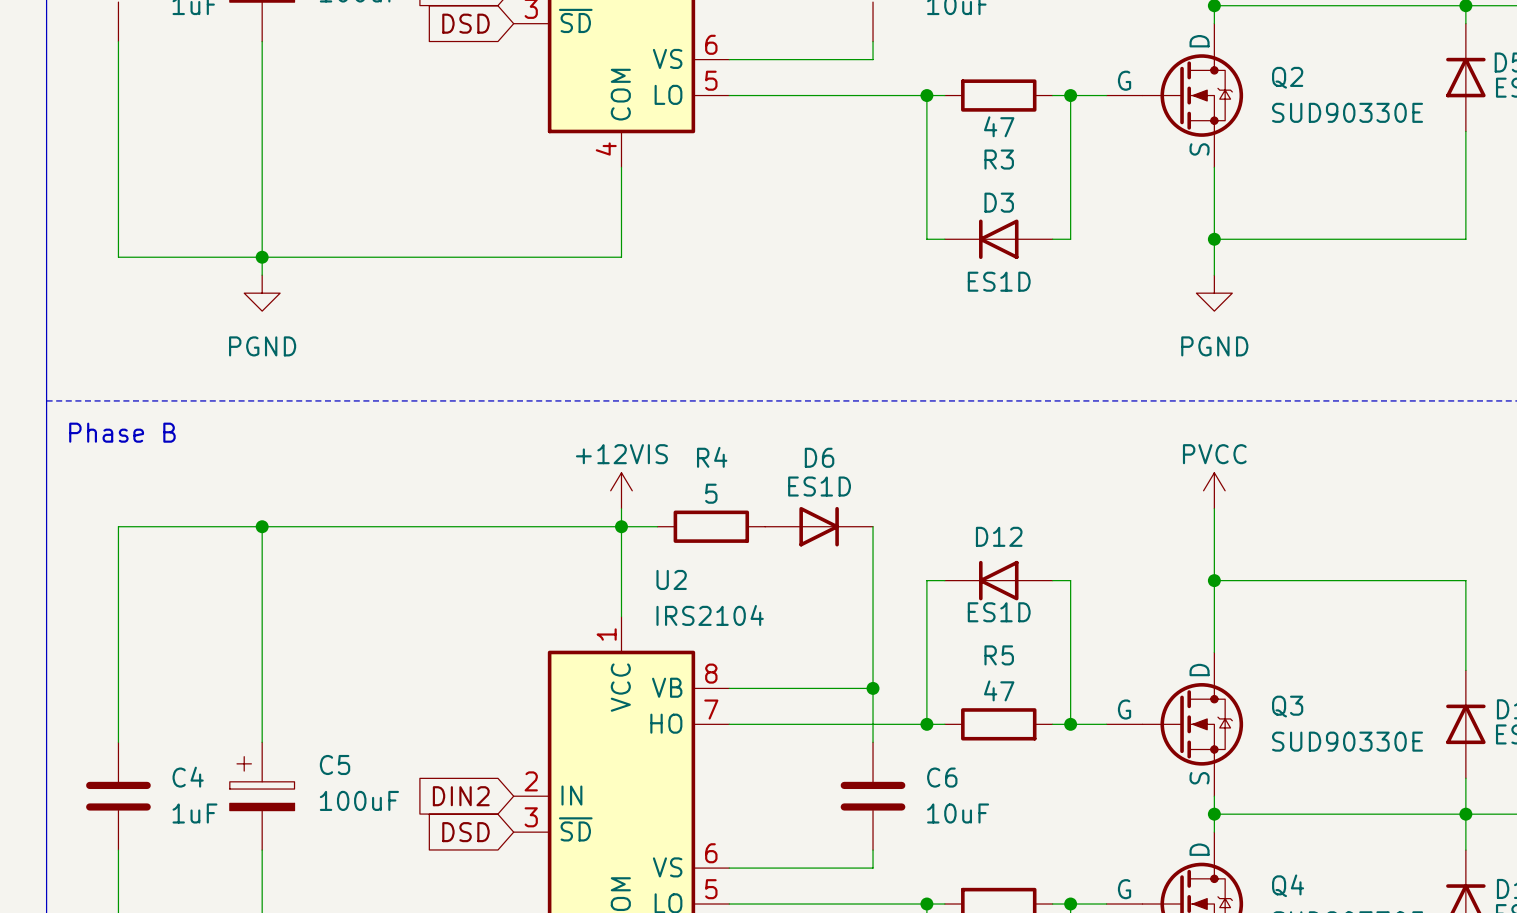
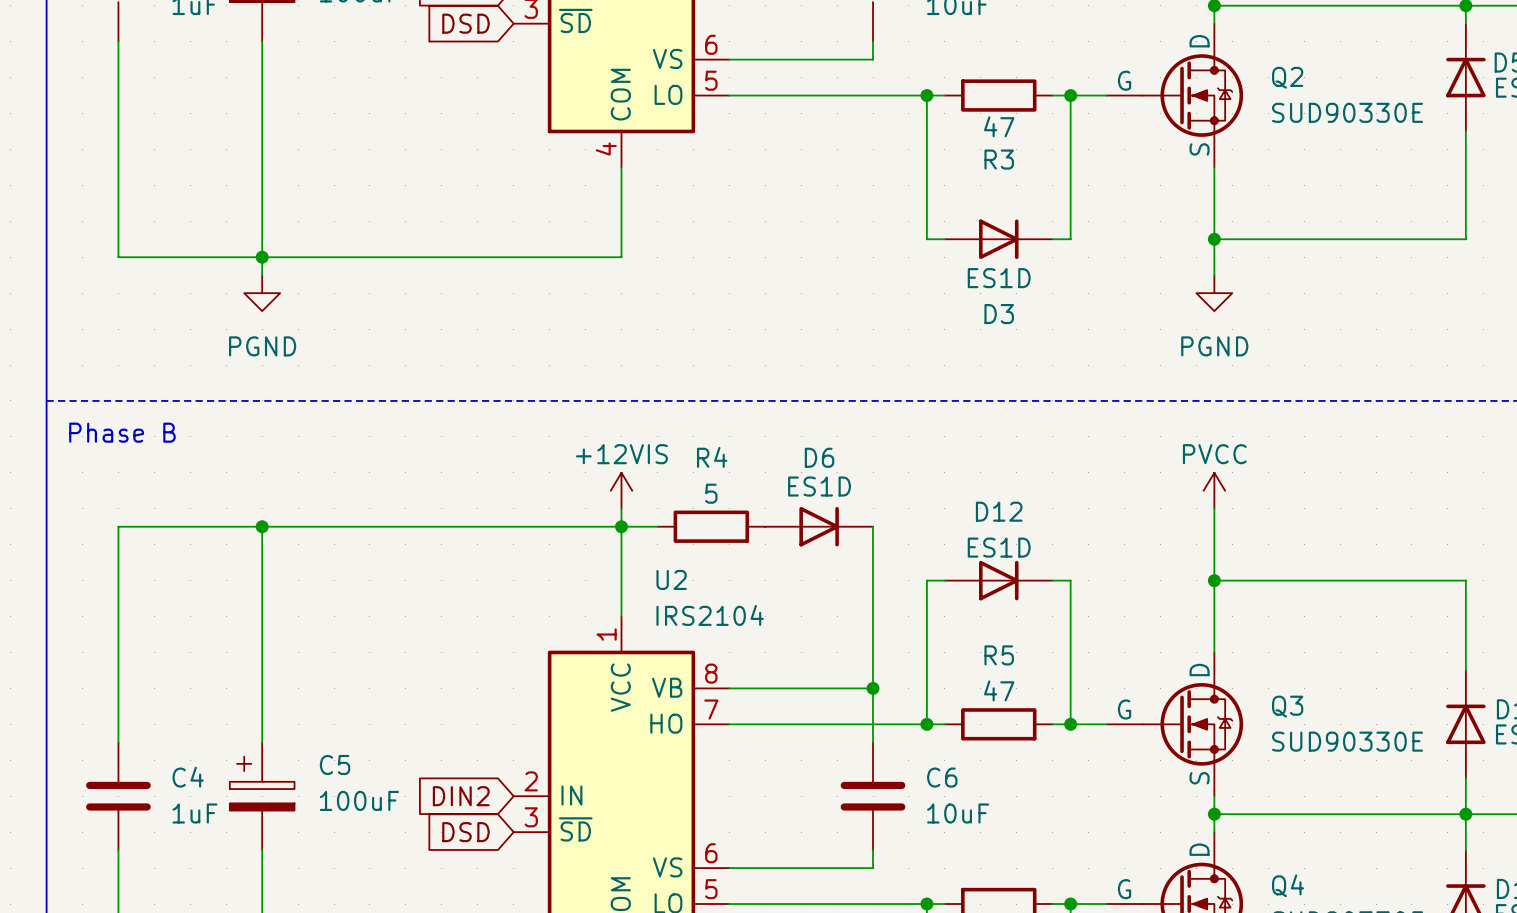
D3 name position: D3 (999, 202) -> D3 (999, 314)
D3 rotation: 0° (998, 239) -> 180° (998, 239)
D12 rotation: 0° (998, 580) -> 180° (998, 580)

